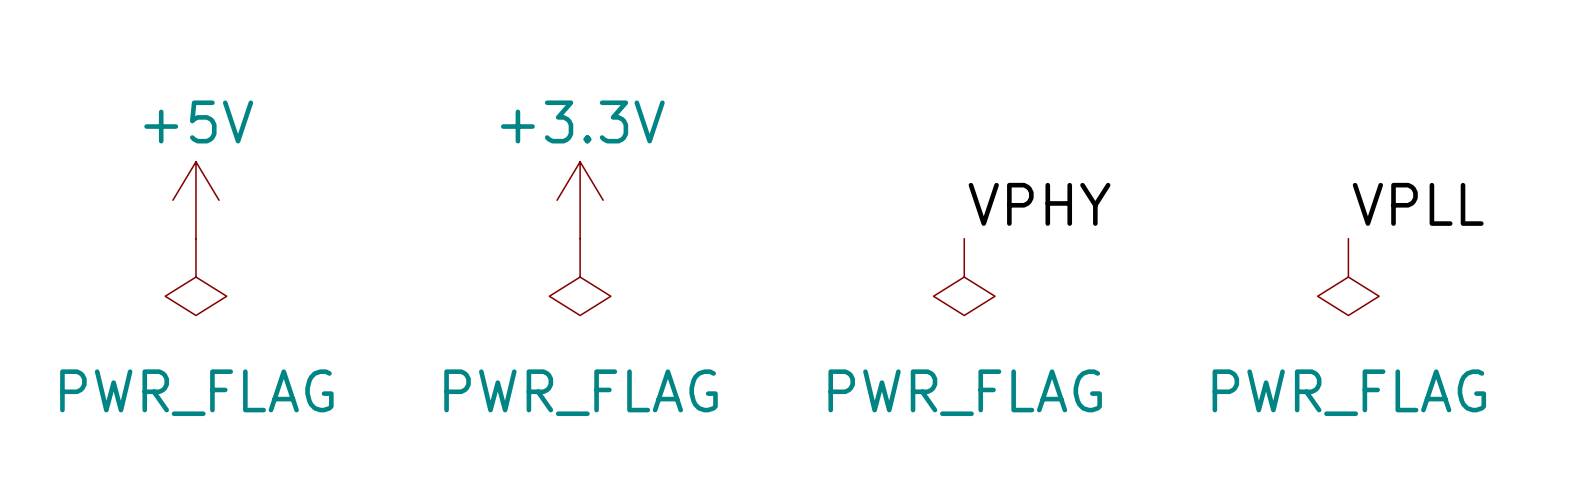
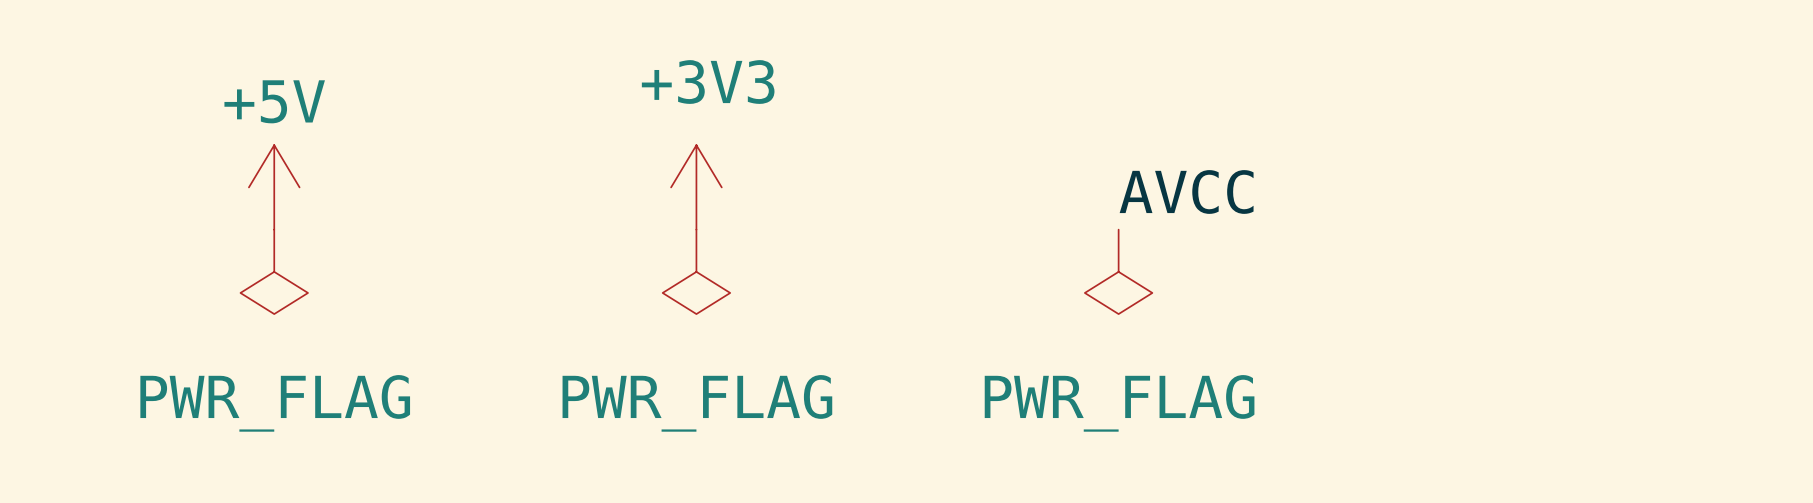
power symbol: +3.3V (580, 200) -> +3V3 (696, 187)
label: VPHY (1039, 204) -> AVCC (1186, 191)
label: VPLL (1418, 204) -> none
power symbol: PWR_FLAG (1348, 277) -> none

